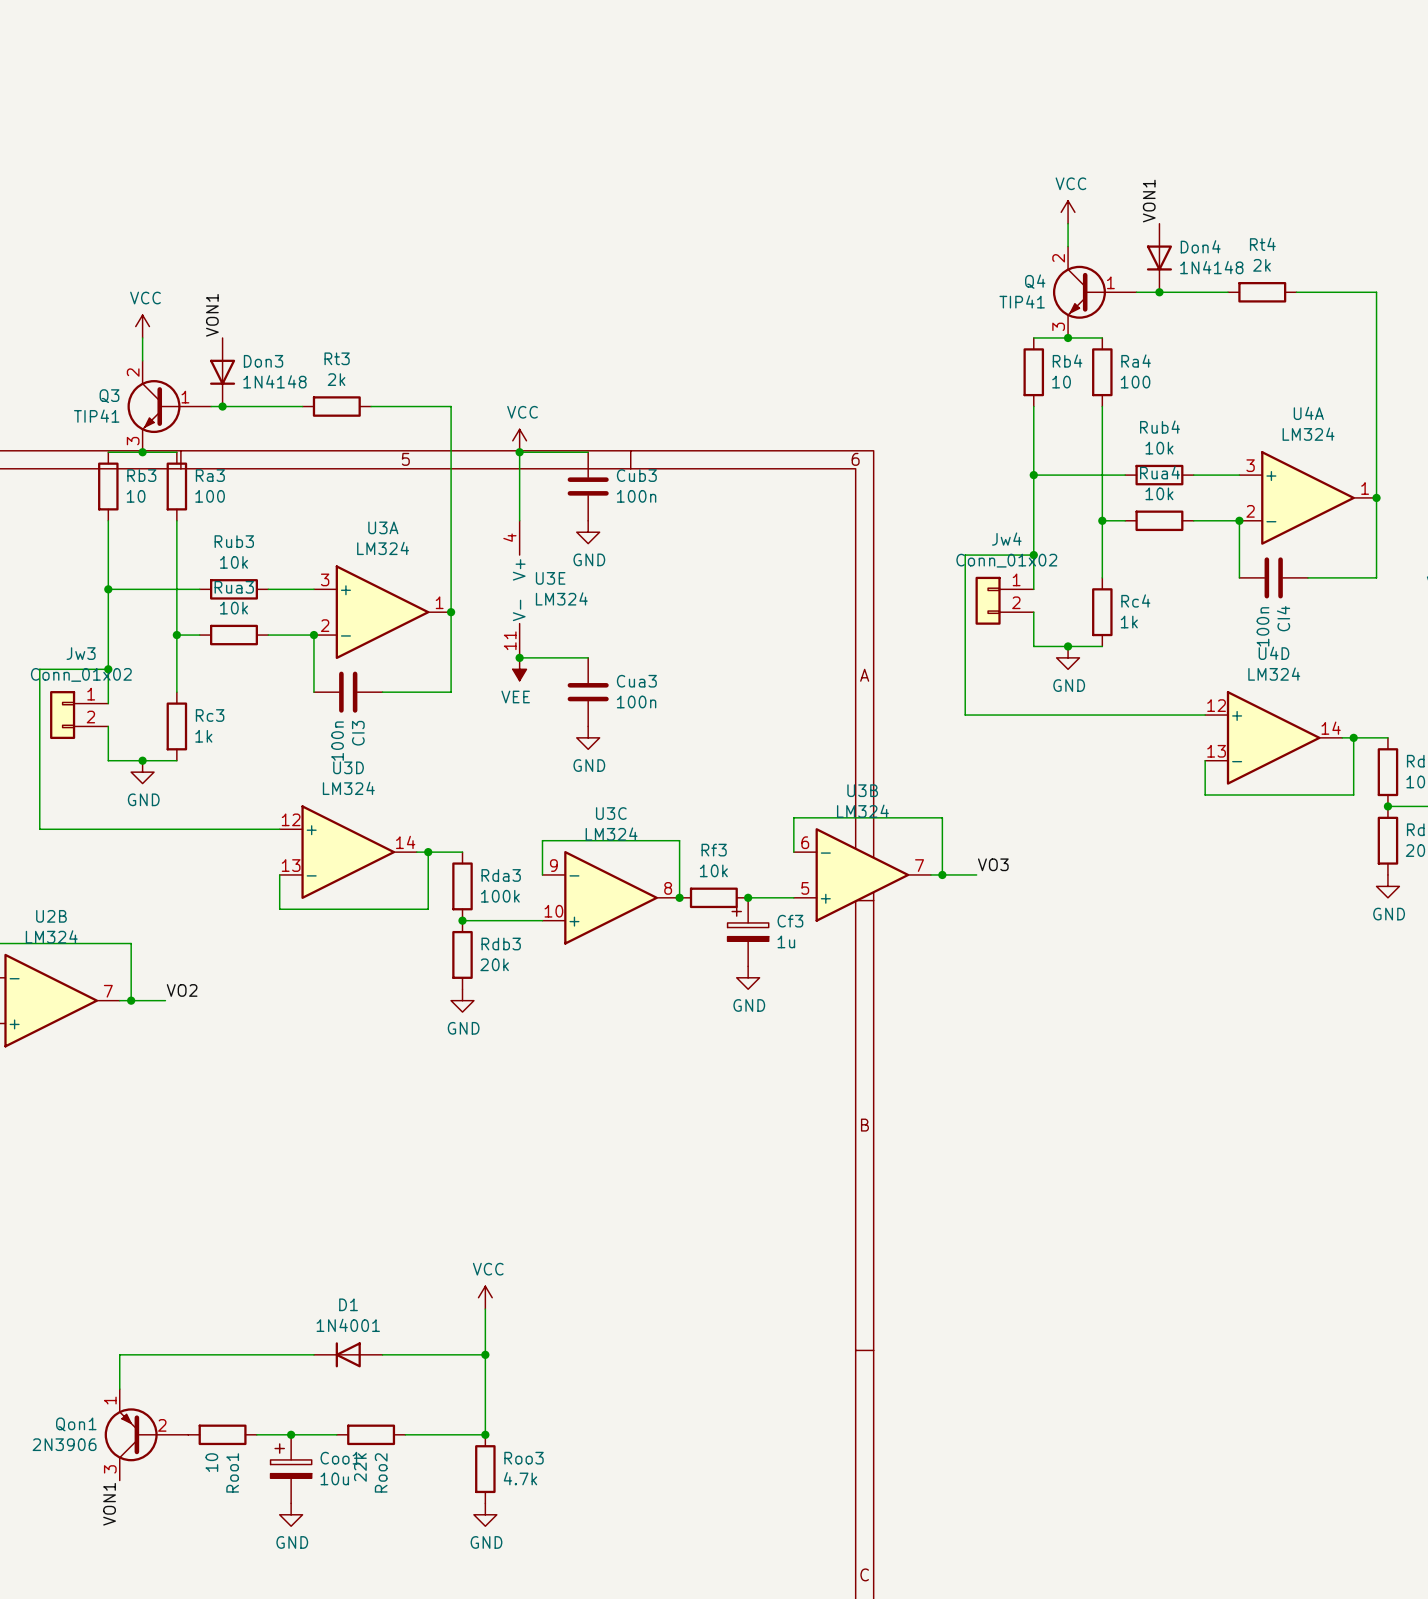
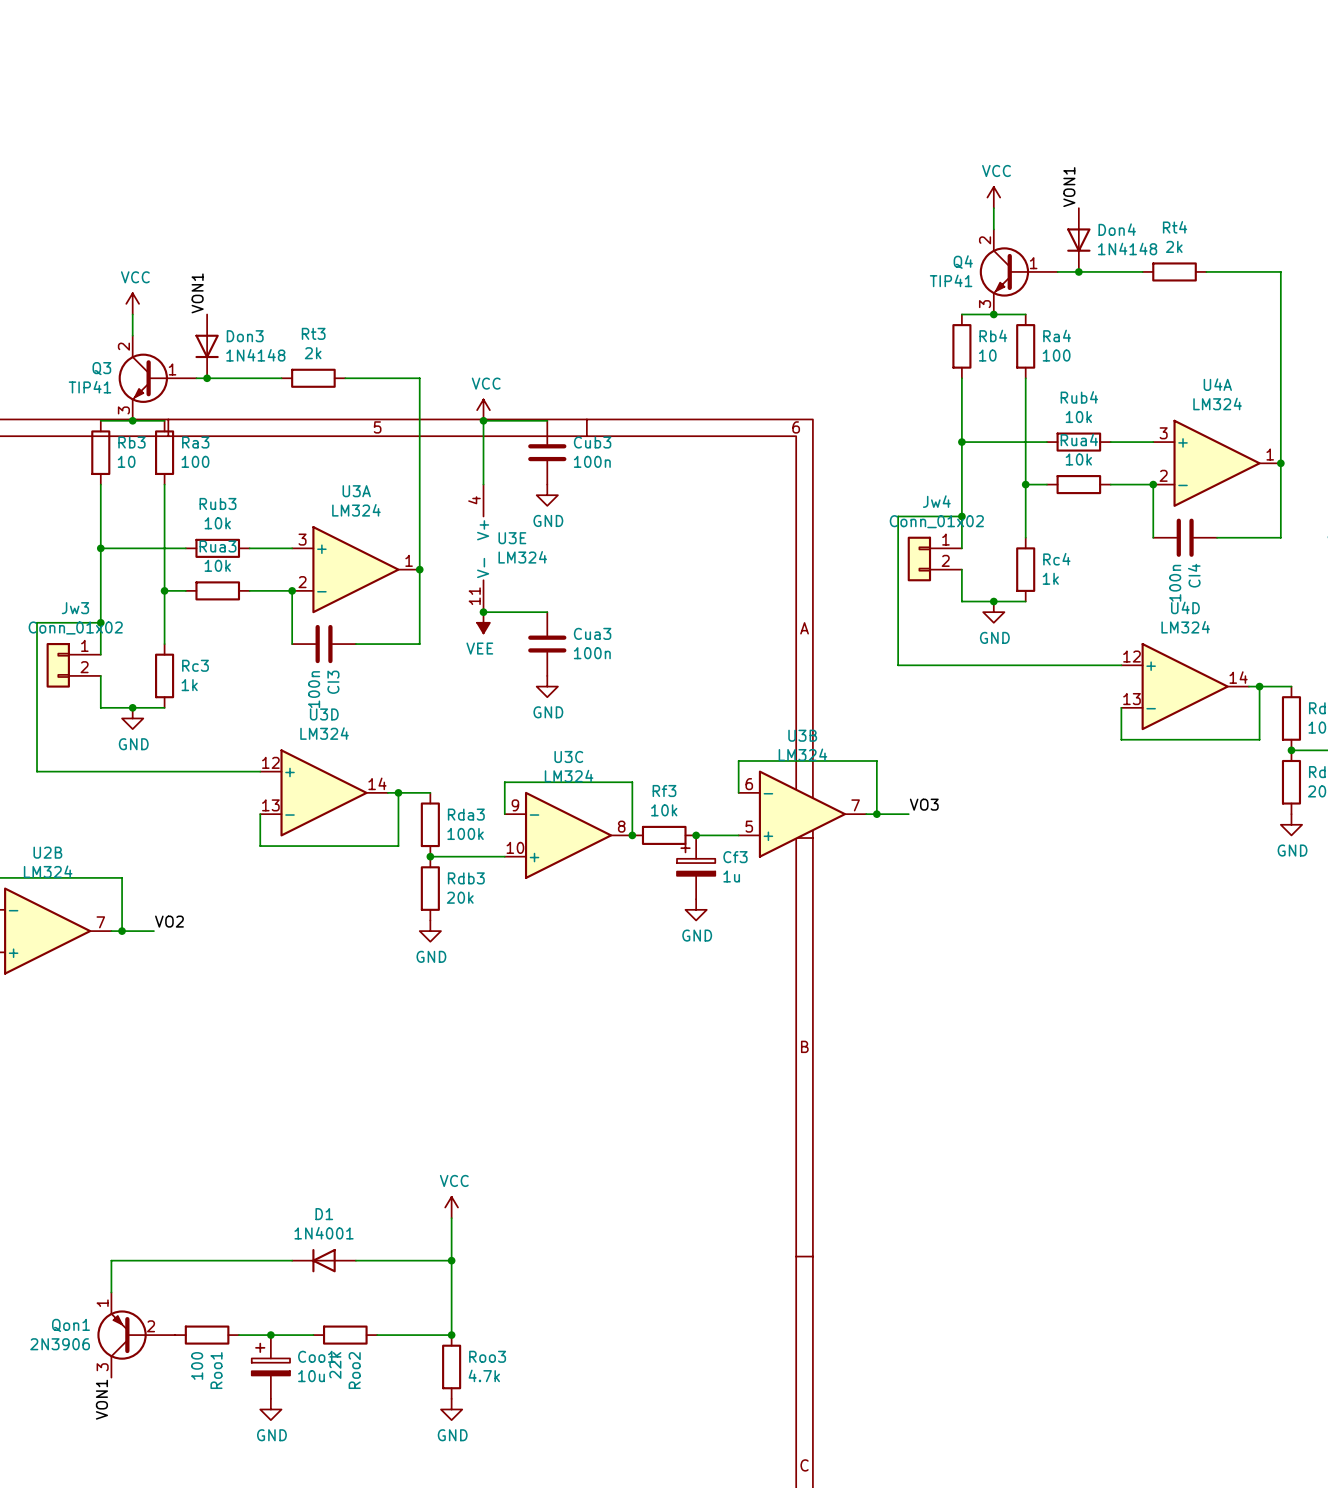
Roo1 value: 10 (211, 1462) -> 100 (197, 1365)

